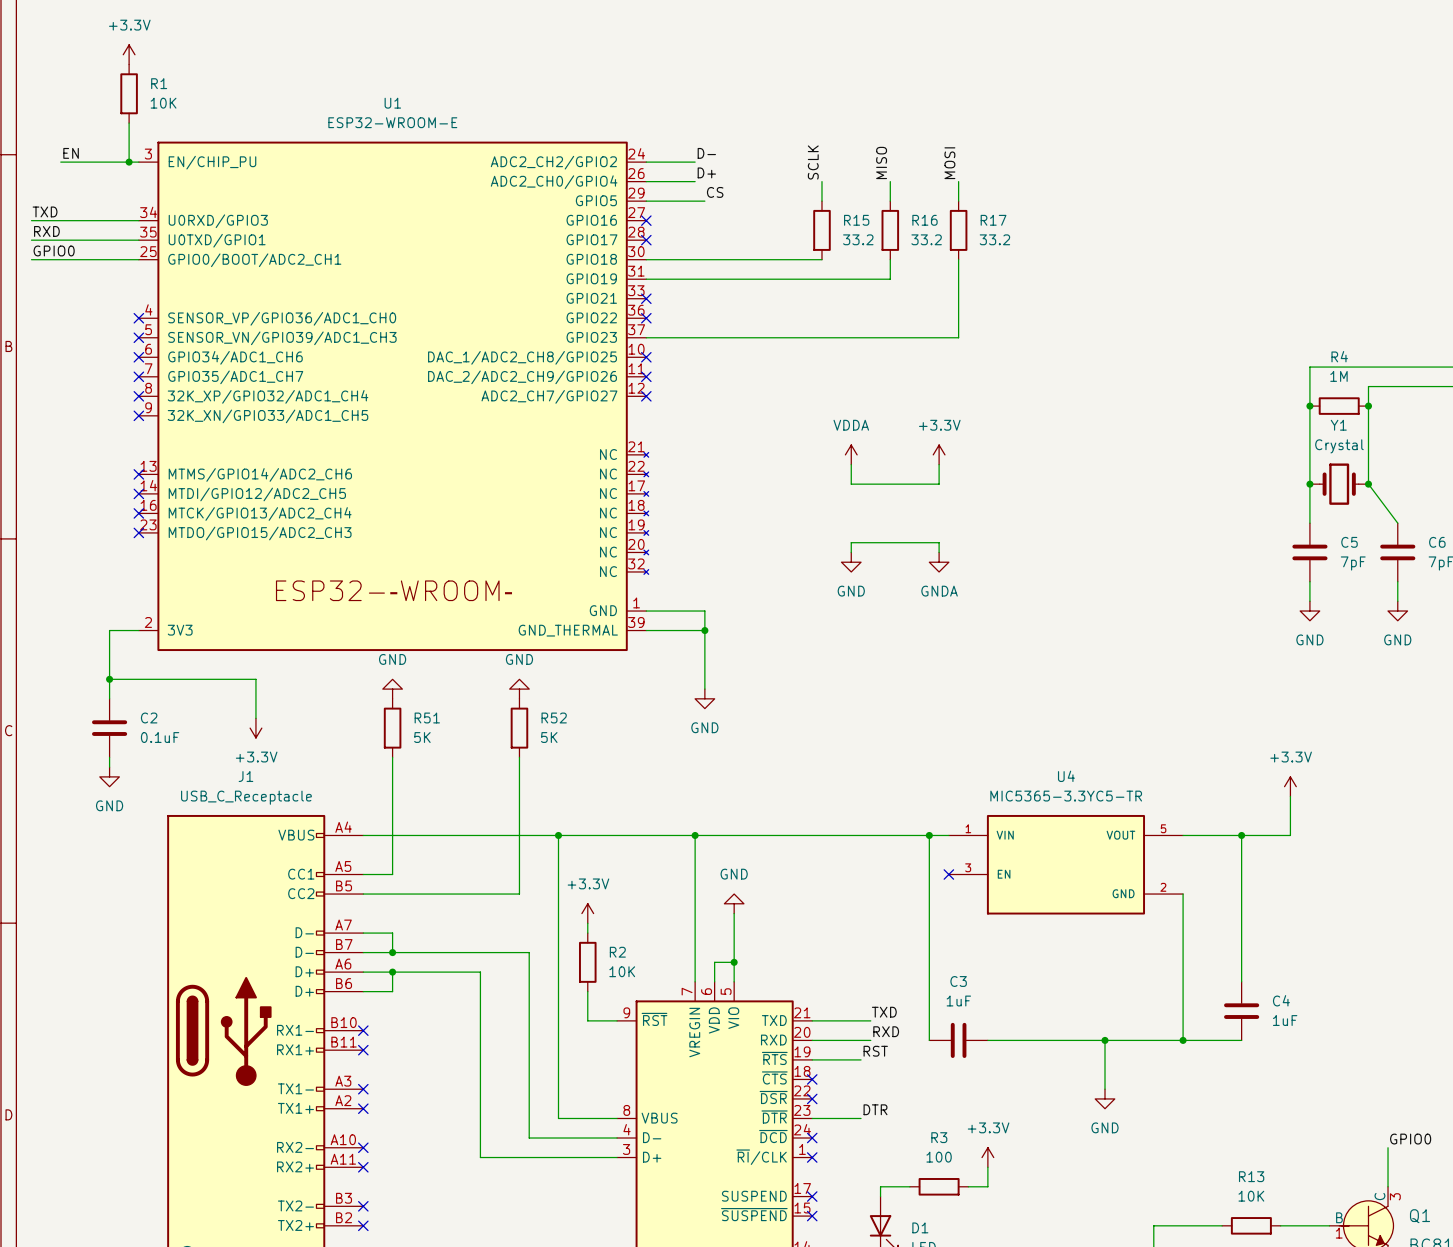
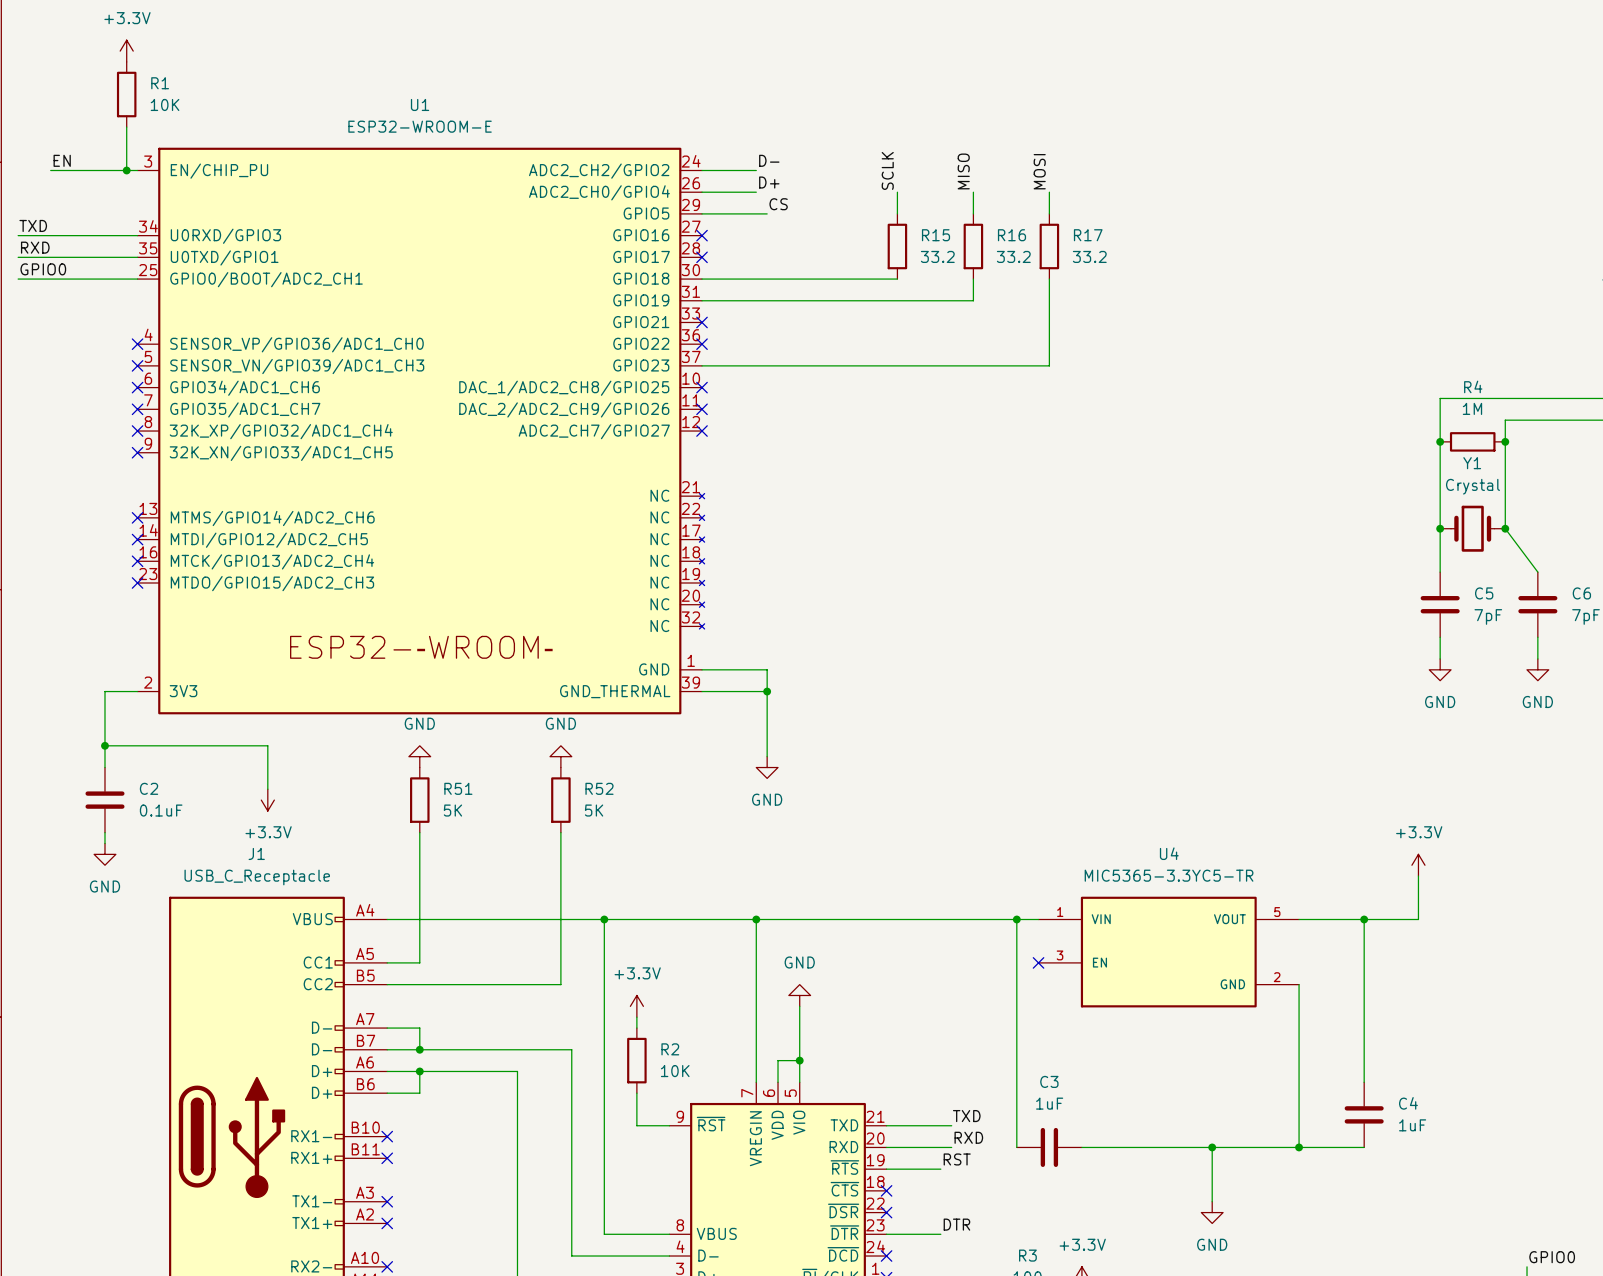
power symbol: VDDA (851, 454) -> none
power symbol: +3.3V (939, 454) -> none
wire: (851, 464) (851, 484) (939, 484) (939, 464) -> none
wire: (851, 552) (851, 542) (939, 542) (939, 552) -> none
power symbol: GND (851, 562) -> none
power symbol: GNDA (939, 562) -> none

